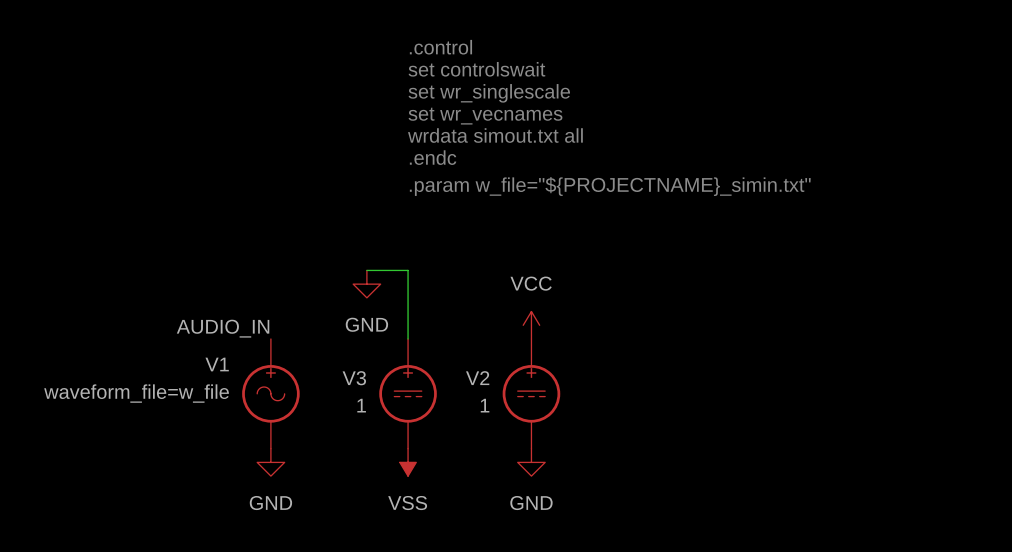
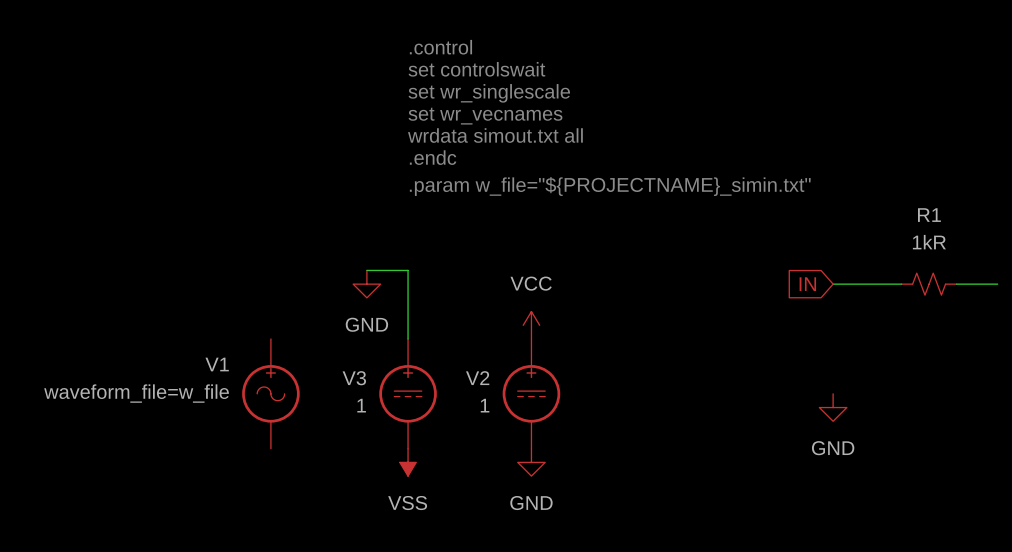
global label: none -> IN (807, 284)
wire: none -> (833, 284) (901, 284)
R1: none -> 1kR (929, 284)
wire: none -> (956, 284) (997, 284)
label: AUDIO_IN (223, 328) -> none
power symbol: none -> GND (833, 407)
power symbol: GND (270, 462) -> none

